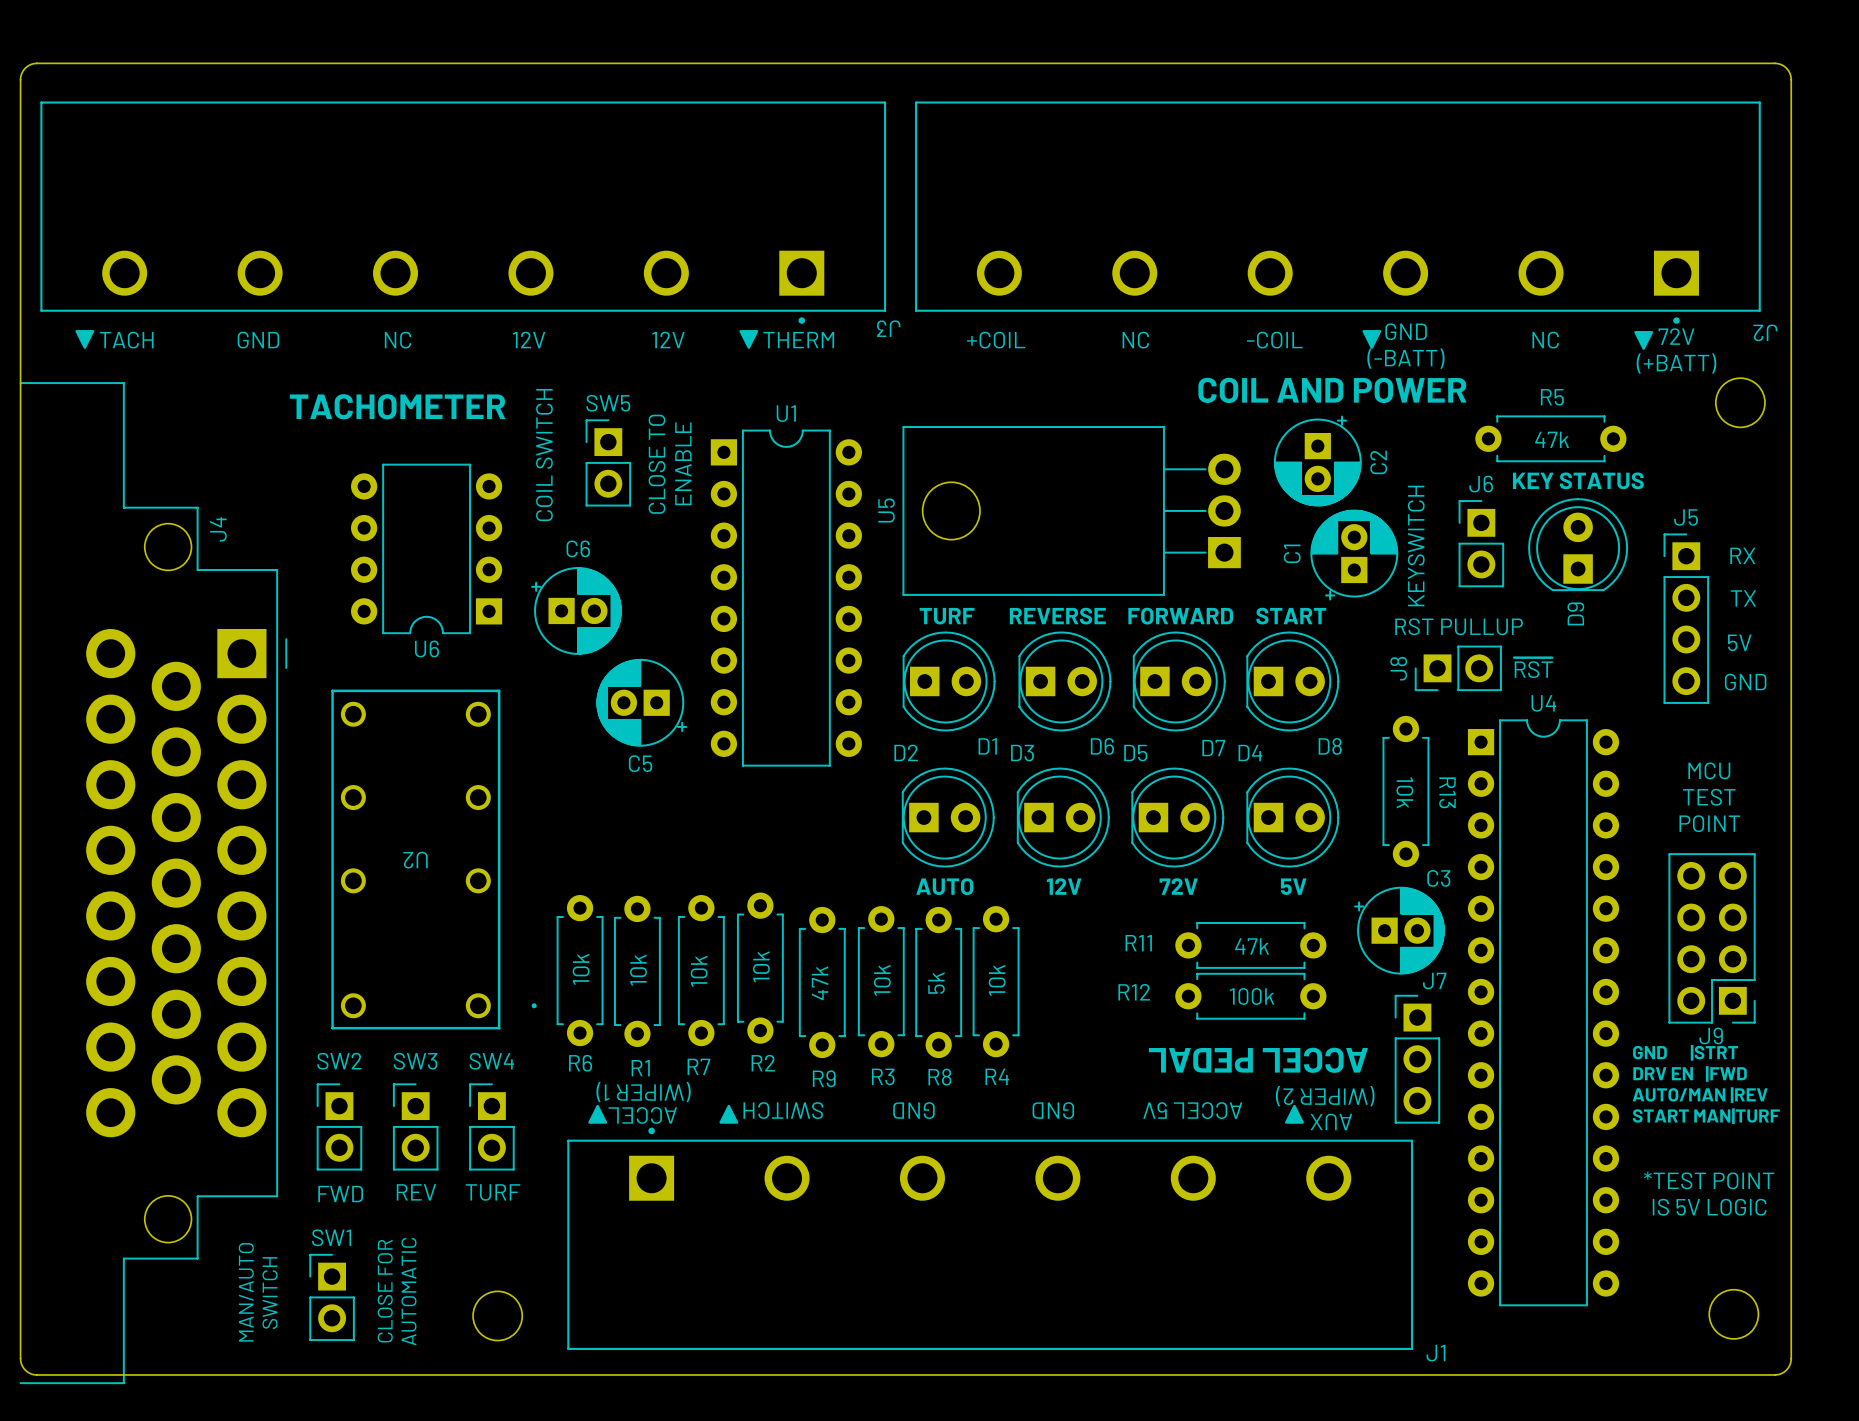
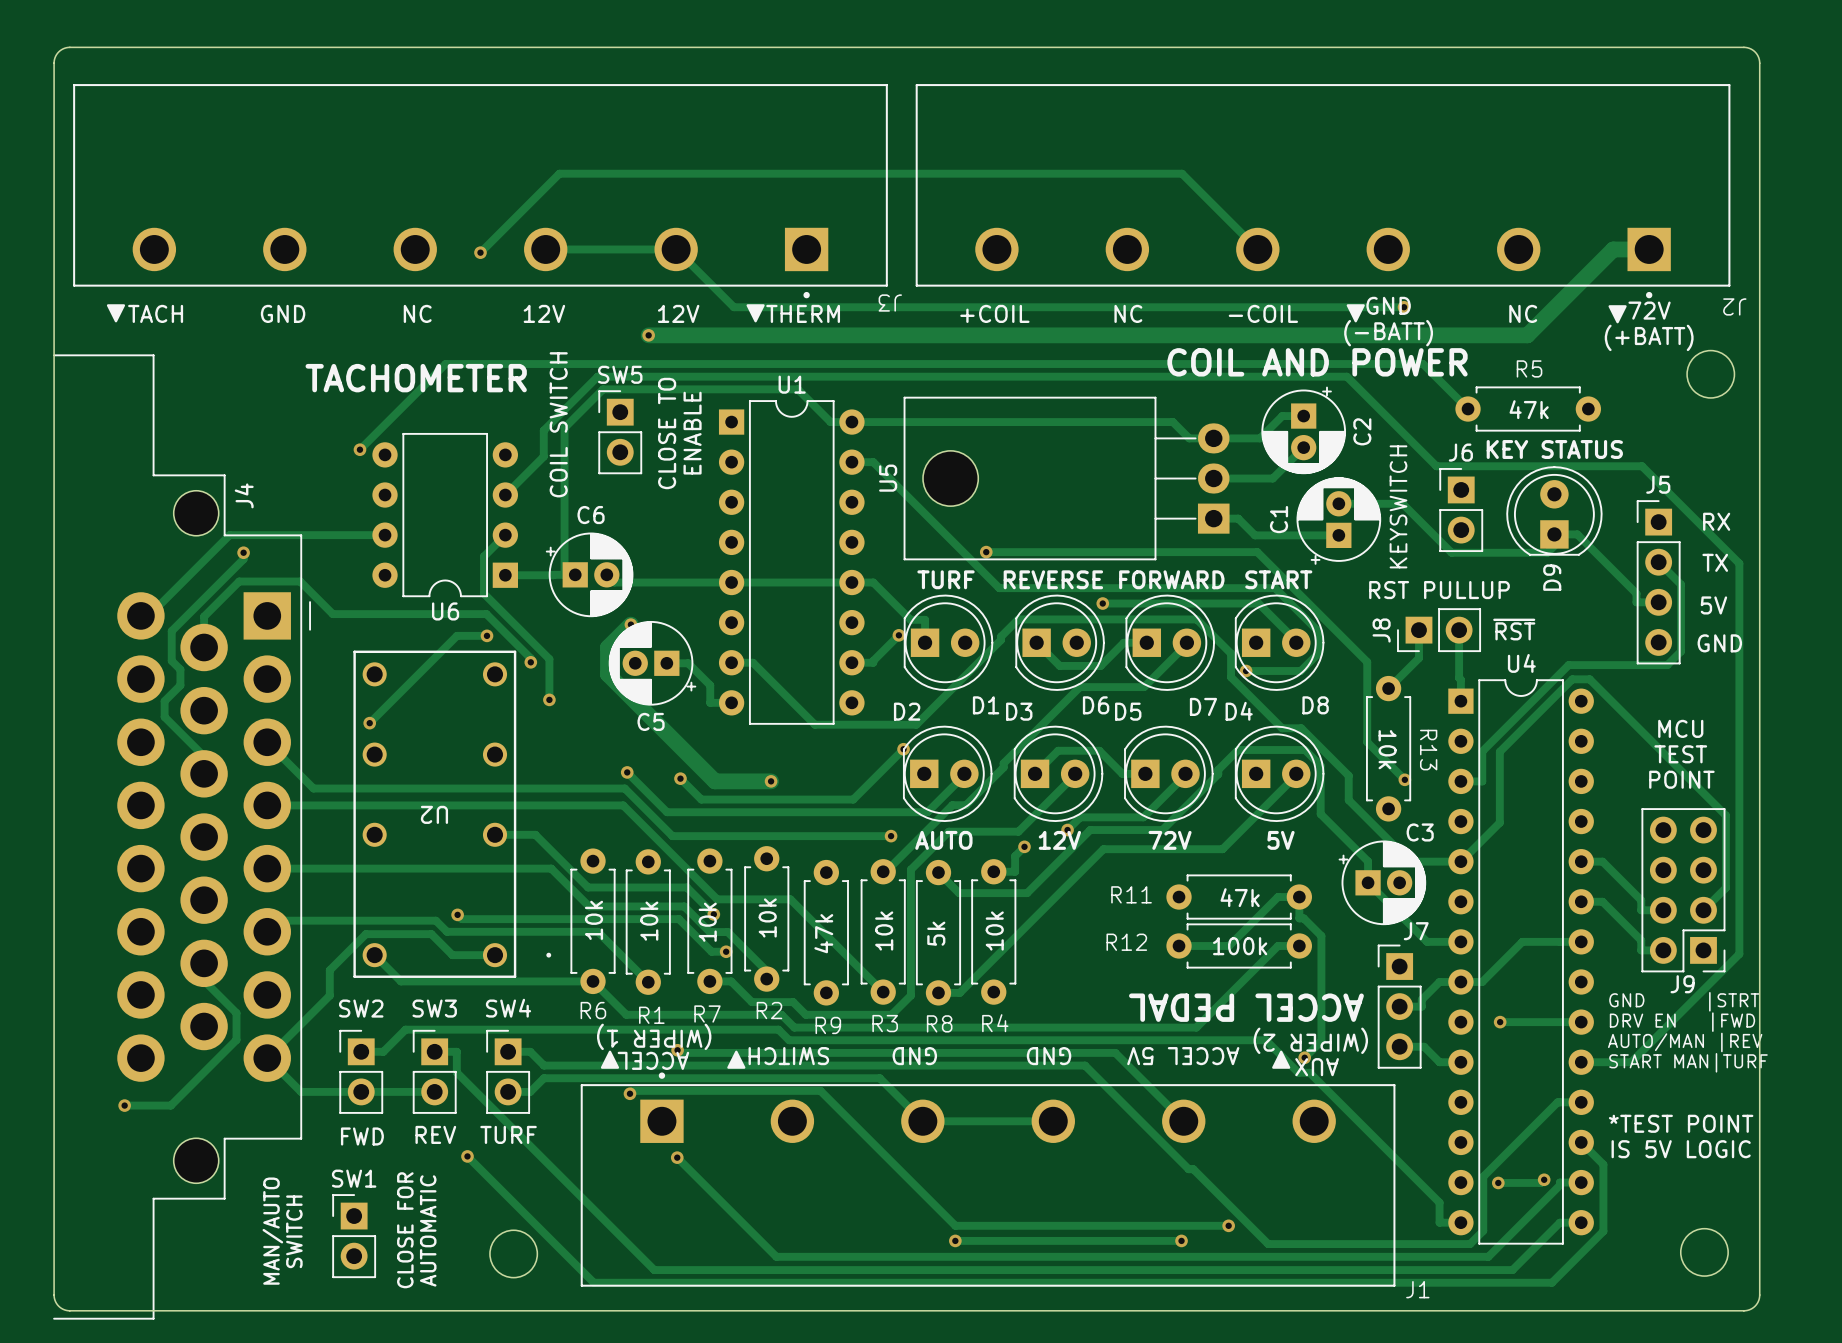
track: none -> (545, 249) (676, 249) (733, 307) (1404, 307)
track: none -> (1257, 249) (1182, 173) (559, 173) (480, 252)
track: none -> (1649, 249) (1613, 249) (1527, 335) (648, 335)
via: none -> (480, 252)
via: none -> (1404, 307)
via: none -> (648, 335)
track: none -> (1468, 409) (1423, 364) (445, 364) (359, 449)
track: none -> (1303, 416) (1282, 416) (1260, 438) (1189, 438) (1172, 422) (830, 422) (797, 389) (603, 389) (564, 427) (564, 574)
track: none -> (1303, 447) (1272, 478) (1213, 478)
via: none -> (359, 449)
track: none -> (851, 462) (873, 462) (999, 588) (1275, 588) (1319, 632) (1319, 652) (1300, 671) (1246, 671)
track: none -> (505, 495) (543, 456) (543, 430) (597, 376) (1346, 376) (1436, 466) (1642, 466) (1739, 563) (1739, 954) (1631, 1062) (1581, 1062)
track: none -> (1338, 503) (1402, 503) (1451, 552) (1547, 552) (1565, 534)
track: none -> (1213, 518) (1238, 518) (1255, 535) (1338, 535)
track: none -> (1554, 534) (1577, 534) (1636, 593) (1636, 602) (1658, 602)
track: none -> (385, 535) (229, 535) (148, 615) (140, 615)
track: none -> (505, 535) (484, 556) (484, 593) (549, 659) (549, 699)
track: none -> (986, 552) (1257, 552) (1367, 662) (1367, 742) (1404, 779)
via: none -> (986, 552)
track: none -> (243, 552) (243, 559) (171, 631) (171, 660) (180, 669) (180, 685) (164, 701) (164, 716) (204, 756) (204, 773)
via: none -> (243, 552)
track: none -> (1658, 562) (1680, 584) (1680, 651) (1667, 665) (1568, 665) (1482, 751) (1482, 781) (1460, 781)
track: none -> (575, 574) (505, 575)
track: none -> (606, 574) (614, 582) (873, 582) (910, 619) (925, 619) (925, 642)
track: none -> (1102, 603) (1258, 603) (1296, 642)
via: none -> (1102, 603)
track: none -> (630, 624) (607, 647) (607, 674) (714, 781) (771, 781)
via: none -> (630, 624)
track: none -> (1418, 630) (1418, 658) (1388, 688)
track: none -> (1459, 630) (1460, 701)
track: none -> (898, 635) (873, 662) (851, 662)
via: none -> (898, 635)
track: none -> (486, 635) (456, 635) (369, 723)
via: none -> (486, 635)
track: none -> (1036, 642) (1059, 665) (1100, 665) (1123, 642) (1146, 642)
track: none -> (1186, 642) (1144, 687) (1079, 687) (1003, 763) (1003, 767) (965, 805) (952, 805) (885, 871) (883, 871)
track: none -> (204, 647) (204, 616) (239, 581) (300, 581) (332, 614) (486, 614) (530, 658) (530, 662)
via: none -> (530, 662)
track: none -> (666, 663) (688, 663) (710, 685) (710, 702) (731, 702)
track: none -> (731, 662) (752, 662) (814, 724) (916, 724) (1001, 639) (1001, 636) (1018, 619) (1196, 619) (1231, 653) (1231, 677) (1282, 728) (1301, 728) (1348, 775) (1348, 800) (1410, 861) (1460, 861) (1499, 822) (1499, 751) (1572, 679) (1589, 679) (1725, 815) (1725, 887) (1703, 910)
via: none -> (1246, 671)
via: none -> (549, 699)
via: none -> (369, 723)
track: none -> (267, 742) (313, 788) (624, 788) (672, 836) (891, 836)
track: none -> (903, 749) (853, 799) (701, 799) (680, 778)
via: none -> (903, 749)
track: none -> (627, 772) (667, 812) (927, 812) (964, 773)
via: none -> (627, 772)
track: none -> (1035, 773) (1058, 750) (1099, 750) (1122, 773) (1145, 773)
track: none -> (1075, 773) (1018, 831) (948, 831) (910, 869) (910, 995) (891, 1014) (805, 1014) (793, 1002) (751, 1002) (731, 981) (709, 981)
track: none -> (1185, 773) (1143, 817) (1080, 817) (1067, 830)
track: none -> (1296, 773) (1222, 849) (1103, 849) (959, 992) (938, 992)
via: none -> (680, 778)
via: none -> (1404, 779)
via: none -> (771, 781)
track: none -> (267, 805) (623, 805) (717, 899) (790, 899) (883, 992)
via: none -> (1067, 830)
track: none -> (495, 834) (535, 834) (588, 887) (686, 887) (713, 914)
via: none -> (891, 836)
track: none -> (1024, 846) (1015, 856) (1015, 871) (993, 871)
via: none -> (1024, 846)
track: none -> (1581, 861) (1602, 861) (1641, 900) (1641, 910) (1663, 910)
track: none -> (267, 868) (551, 868) (589, 906) (684, 906) (709, 932) (727, 932) (766, 971) (766, 979)
track: none -> (938, 872) (959, 893) (1027, 893) (1090, 830) (1162, 830) (1218, 774) (1218, 769) (1238, 750) (1305, 750) (1320, 765) (1320, 814) (1368, 861) (1368, 882) (1427, 941) (1460, 941)
track: none -> (1581, 901) (1602, 901) (1641, 940) (1641, 950) (1663, 950)
track: none -> (457, 914) (461, 919) (679, 919) (711, 951) (726, 951)
via: none -> (457, 914)
via: none -> (713, 914)
track: none -> (267, 931) (278, 920) (435, 920) (447, 931) (597, 931) (648, 982)
track: none -> (1581, 941) (1522, 941) (1482, 981) (1439, 981) (1421, 999) (1421, 1006) (1399, 1006)
track: none -> (1179, 945) (1229, 945) (1278, 897) (1299, 897) (1299, 918) (1303, 918) (1321, 936) (1321, 1041) (1304, 1057)
track: none -> (1299, 945) (1278, 945) (1196, 1027) (794, 1027) (781, 1014) (626, 1014) (593, 981) (400, 981) (374, 955)
via: none -> (726, 951)
track: none -> (495, 955) (452, 955) (431, 934) (365, 934) (329, 970) (329, 995) (267, 1058) (301, 1091) (434, 1091)
track: none -> (204, 963) (204, 980) (236, 1013) (236, 1039) (170, 1105) (124, 1105)
track: none -> (1500, 1022) (1581, 1022)
via: none -> (1500, 1022)
track: none -> (1399, 1046) (1424, 1046) (1439, 1062) (1460, 1062)
track: none -> (677, 1050) (680, 1052) (1115, 1052) (1183, 1121)
via: none -> (677, 1050)
track: none -> (361, 1051) (383, 1051) (405, 1029) (778, 1029) (789, 1040) (1265, 1040) (1298, 1072) (1309, 1072) (1439, 1202) (1439, 1222) (1460, 1222)
track: none -> (434, 1051) (456, 1051) (456, 1072) (654, 1270) (1512, 1270) (1559, 1222) (1581, 1222)
track: none -> (508, 1051) (530, 1051) (544, 1065) (1085, 1065) (1188, 1169) (1193, 1169) (1268, 1244) (1470, 1244) (1483, 1230) (1483, 1176) (1557, 1102) (1581, 1102)
via: none -> (1304, 1057)
track: none -> (508, 1091) (530, 1091) (543, 1078) (879, 1078) (922, 1121) (1053, 1121)
track: none -> (629, 1093) (632, 1090) (820, 1090) (955, 1225) (1228, 1225)
via: none -> (629, 1093)
via: none -> (124, 1105)
track: none -> (1581, 1142) (1603, 1164) (1603, 1231) (1551, 1282) (593, 1282) (467, 1156)
via: none -> (467, 1156)
track: none -> (677, 1157) (776, 1256) (1488, 1256) (1559, 1185) (1559, 1182) (1581, 1182)
via: none -> (677, 1157)
track: none -> (1544, 1179) (1541, 1182) (1498, 1182)
via: none -> (1544, 1179)
via: none -> (1498, 1182)
via: none -> (1228, 1225)
track: none -> (955, 1240) (1181, 1240)
via: none -> (955, 1240)
via: none -> (1181, 1240)

